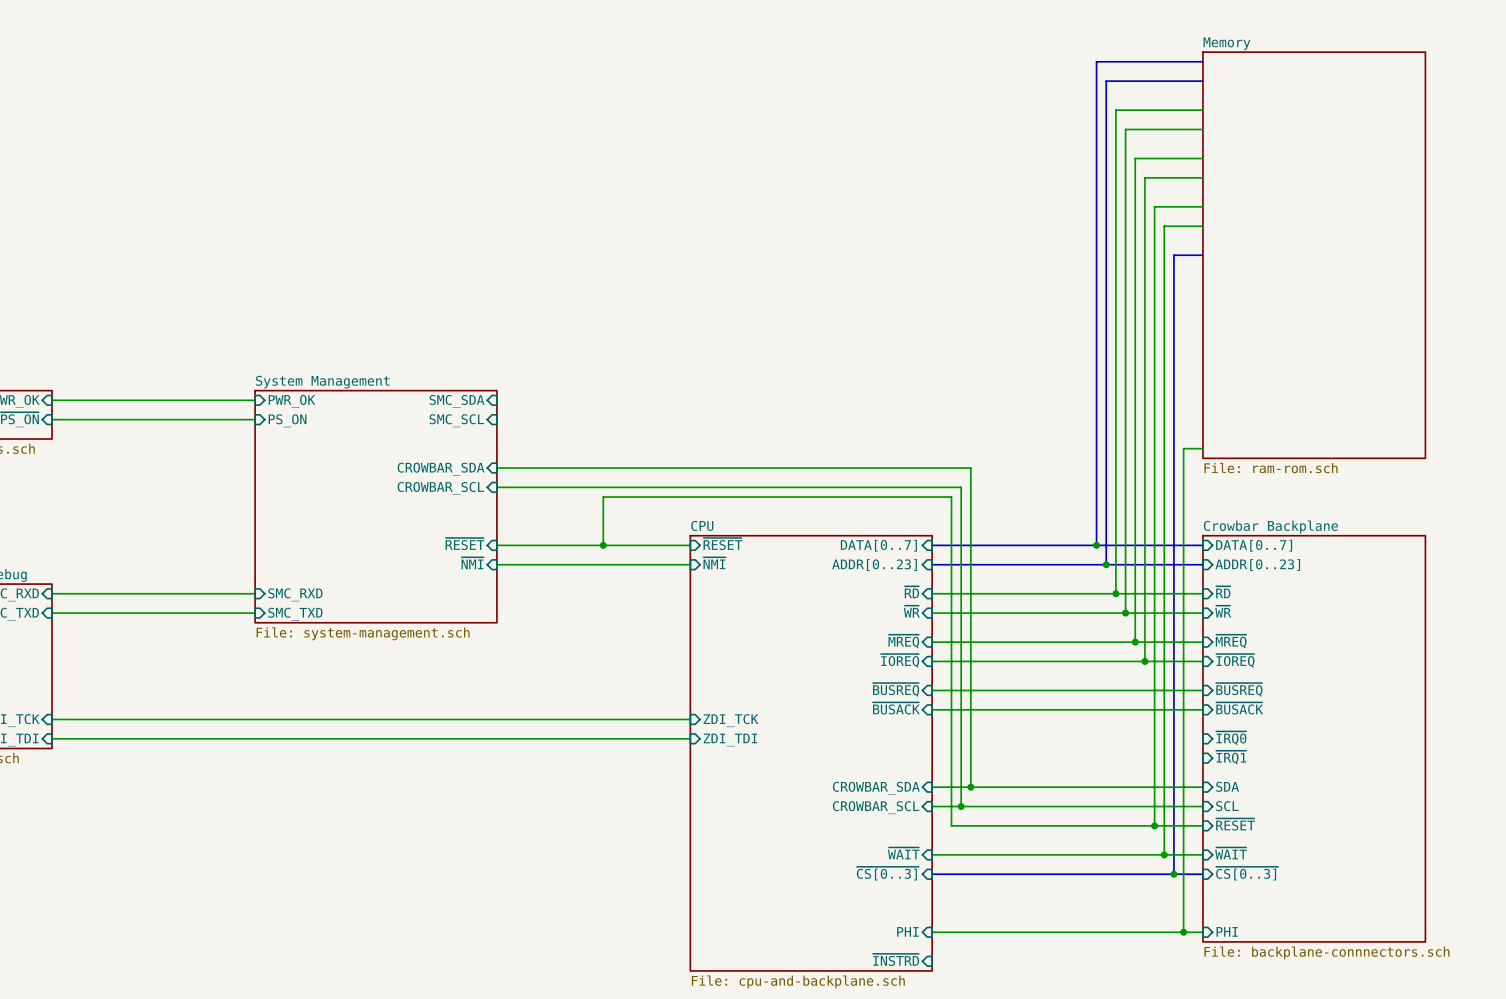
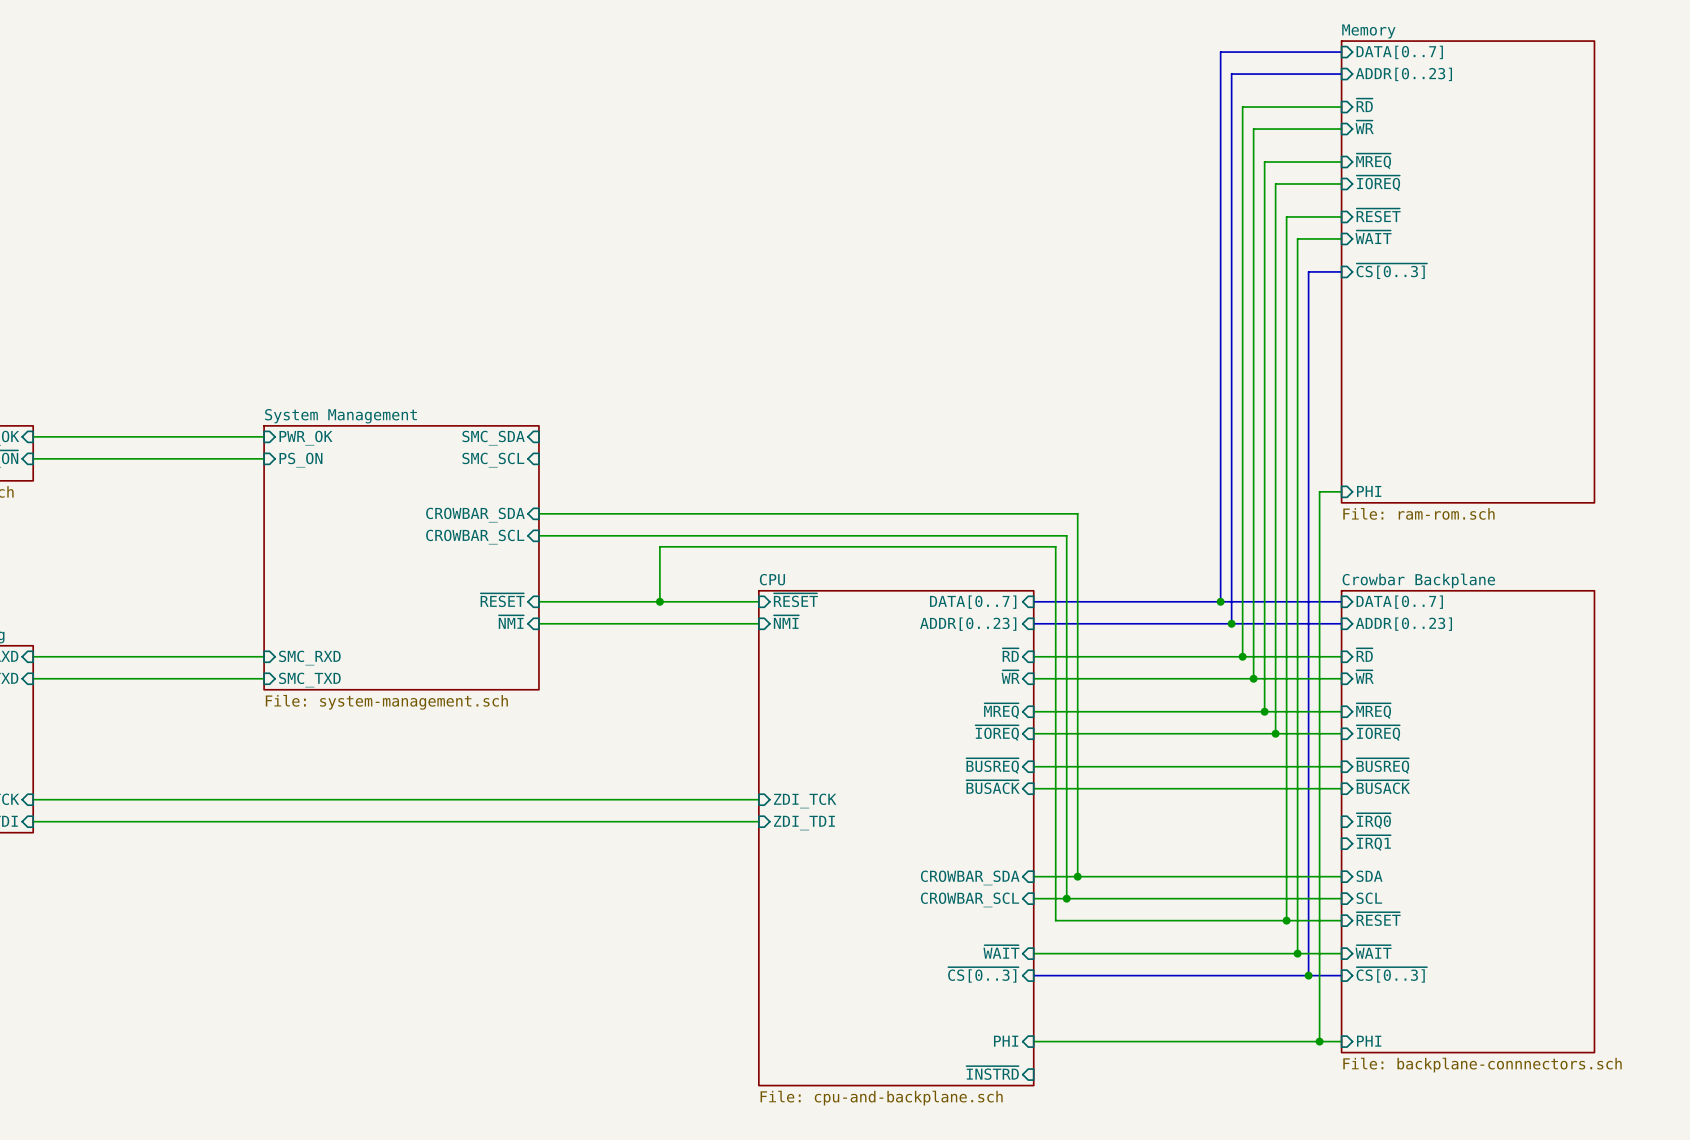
sheet pin: none -> DATA[0..7] (1399, 52)
sheet pin: none -> ADDR[0..23] (1403, 74)
sheet pin: none -> ~{RD} (1364, 105)
sheet pin: none -> ~{WR} (1364, 127)
sheet pin: none -> ~{MREQ} (1373, 161)
sheet pin: none -> ~{IOREQ} (1378, 183)
sheet pin: none -> ~{RESET} (1378, 215)
sheet pin: none -> ~{WAIT} (1373, 237)
sheet pin: none -> ~{CS[0..3]} (1391, 271)
sheet pin: none -> PHI (1369, 491)

